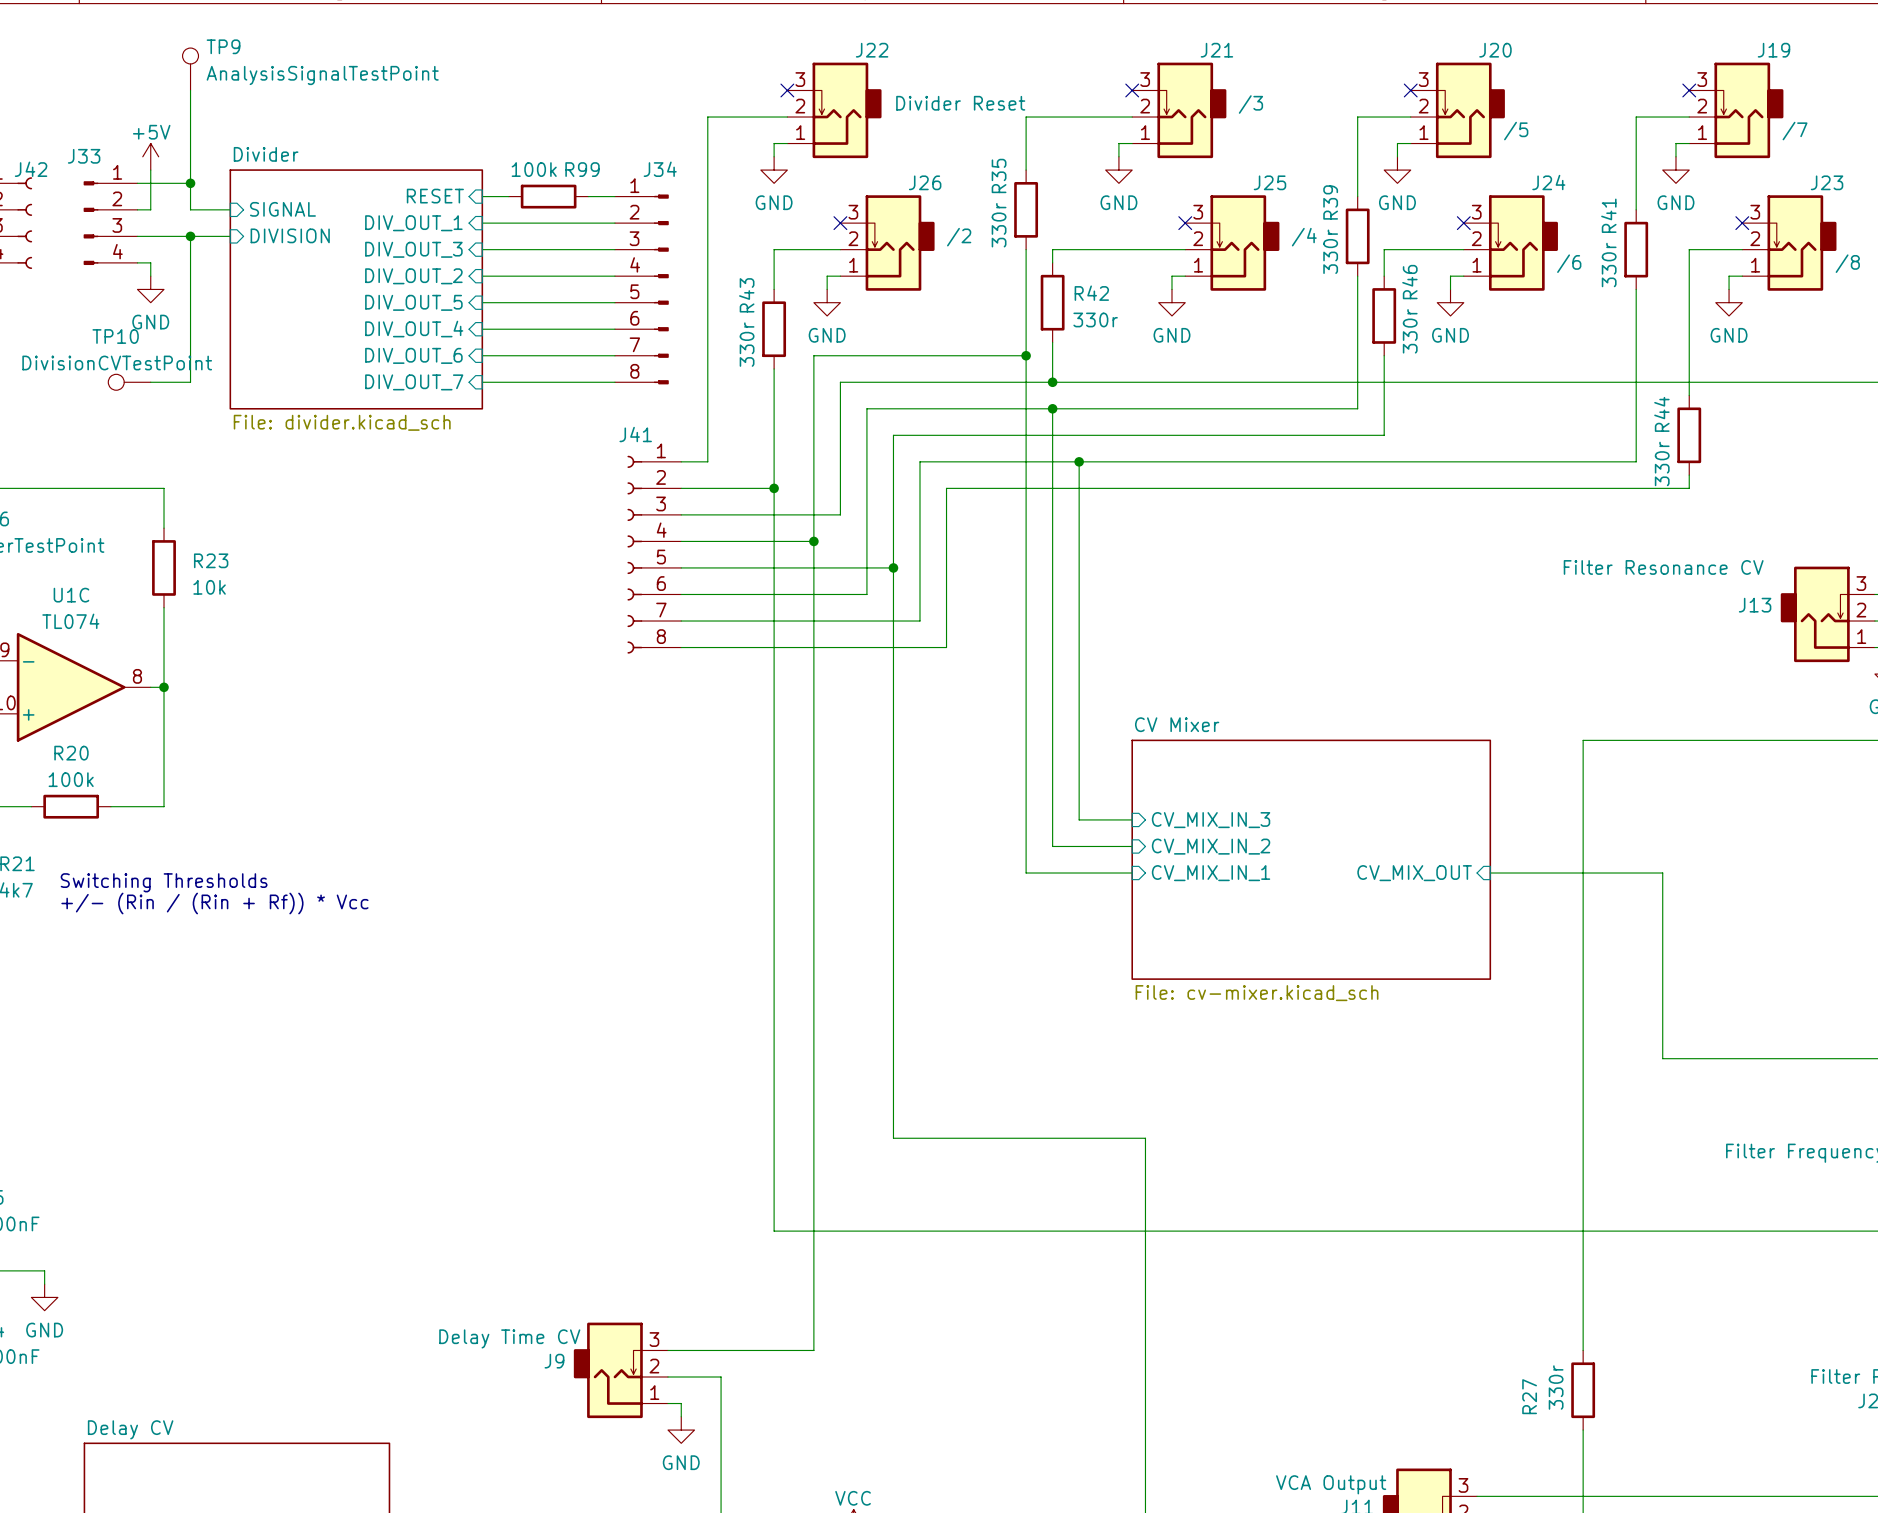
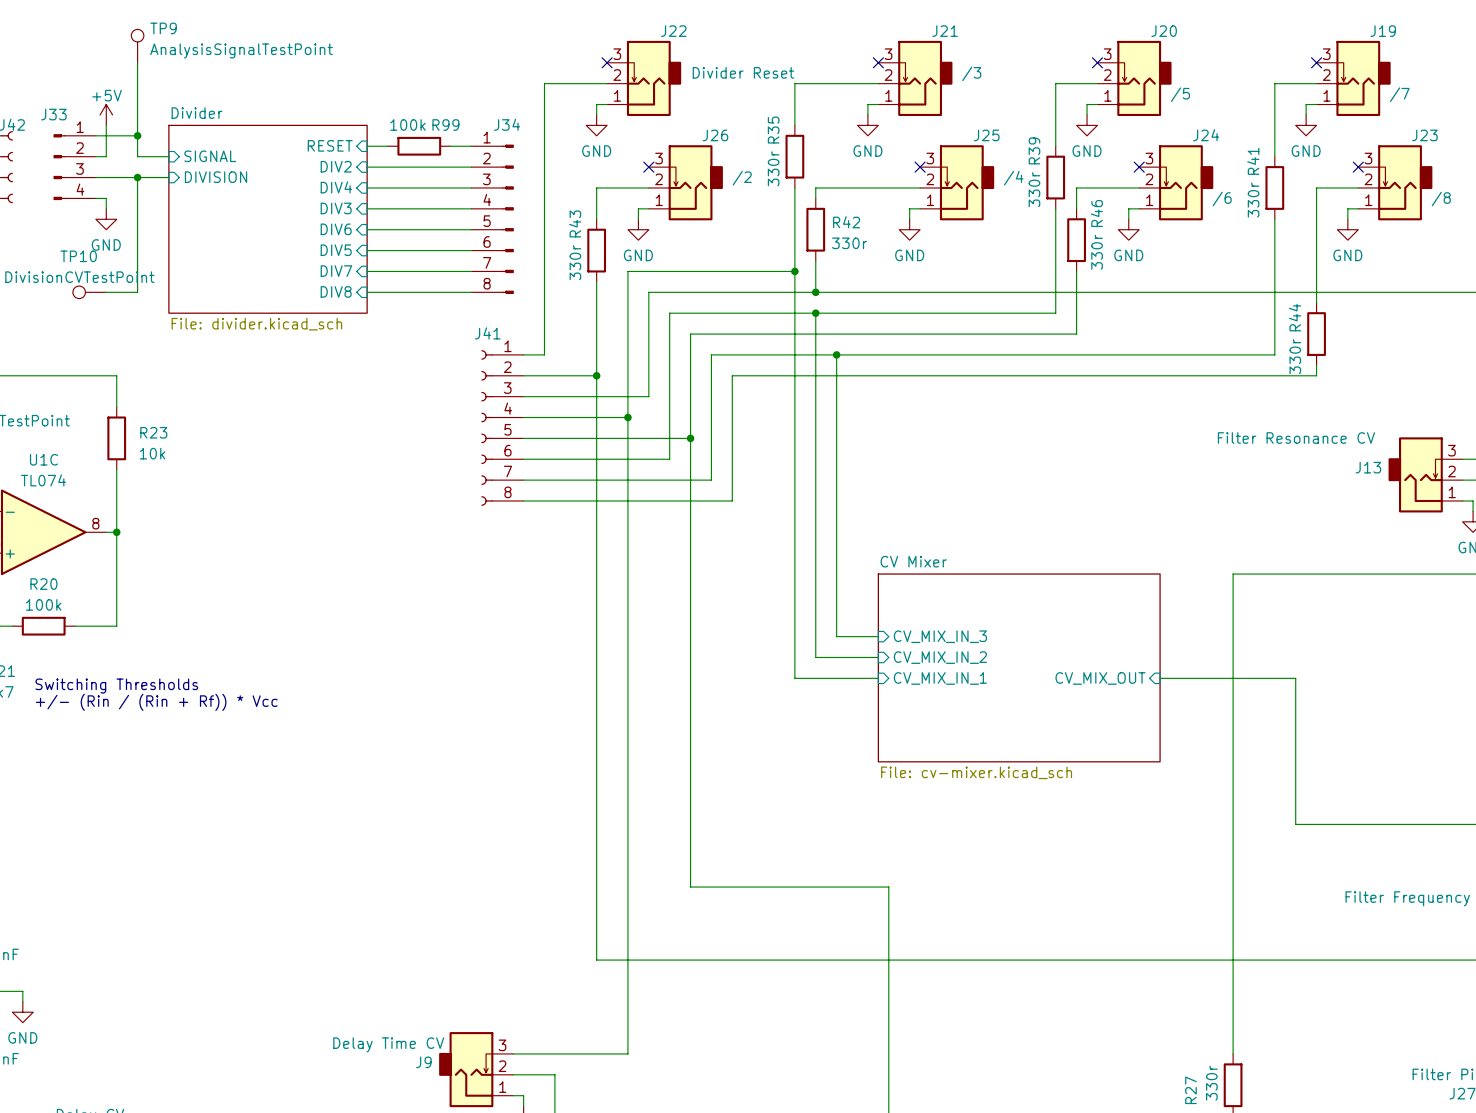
sheet pin: DIV_OUT_1 (413, 223) -> DIV2 (336, 166)
sheet pin: DIV_OUT_3 (413, 249) -> DIV4 (336, 187)
sheet pin: DIV_OUT_2 (413, 276) -> DIV3 (336, 208)
sheet pin: DIV_OUT_5 (413, 302) -> DIV6 (336, 229)
sheet pin: DIV_OUT_4 (414, 329) -> DIV5 (336, 250)
sheet pin: DIV_OUT_6 (413, 355) -> DIV7 (336, 271)
sheet pin: DIV_OUT_7 (414, 382) -> DIV8 (336, 291)

